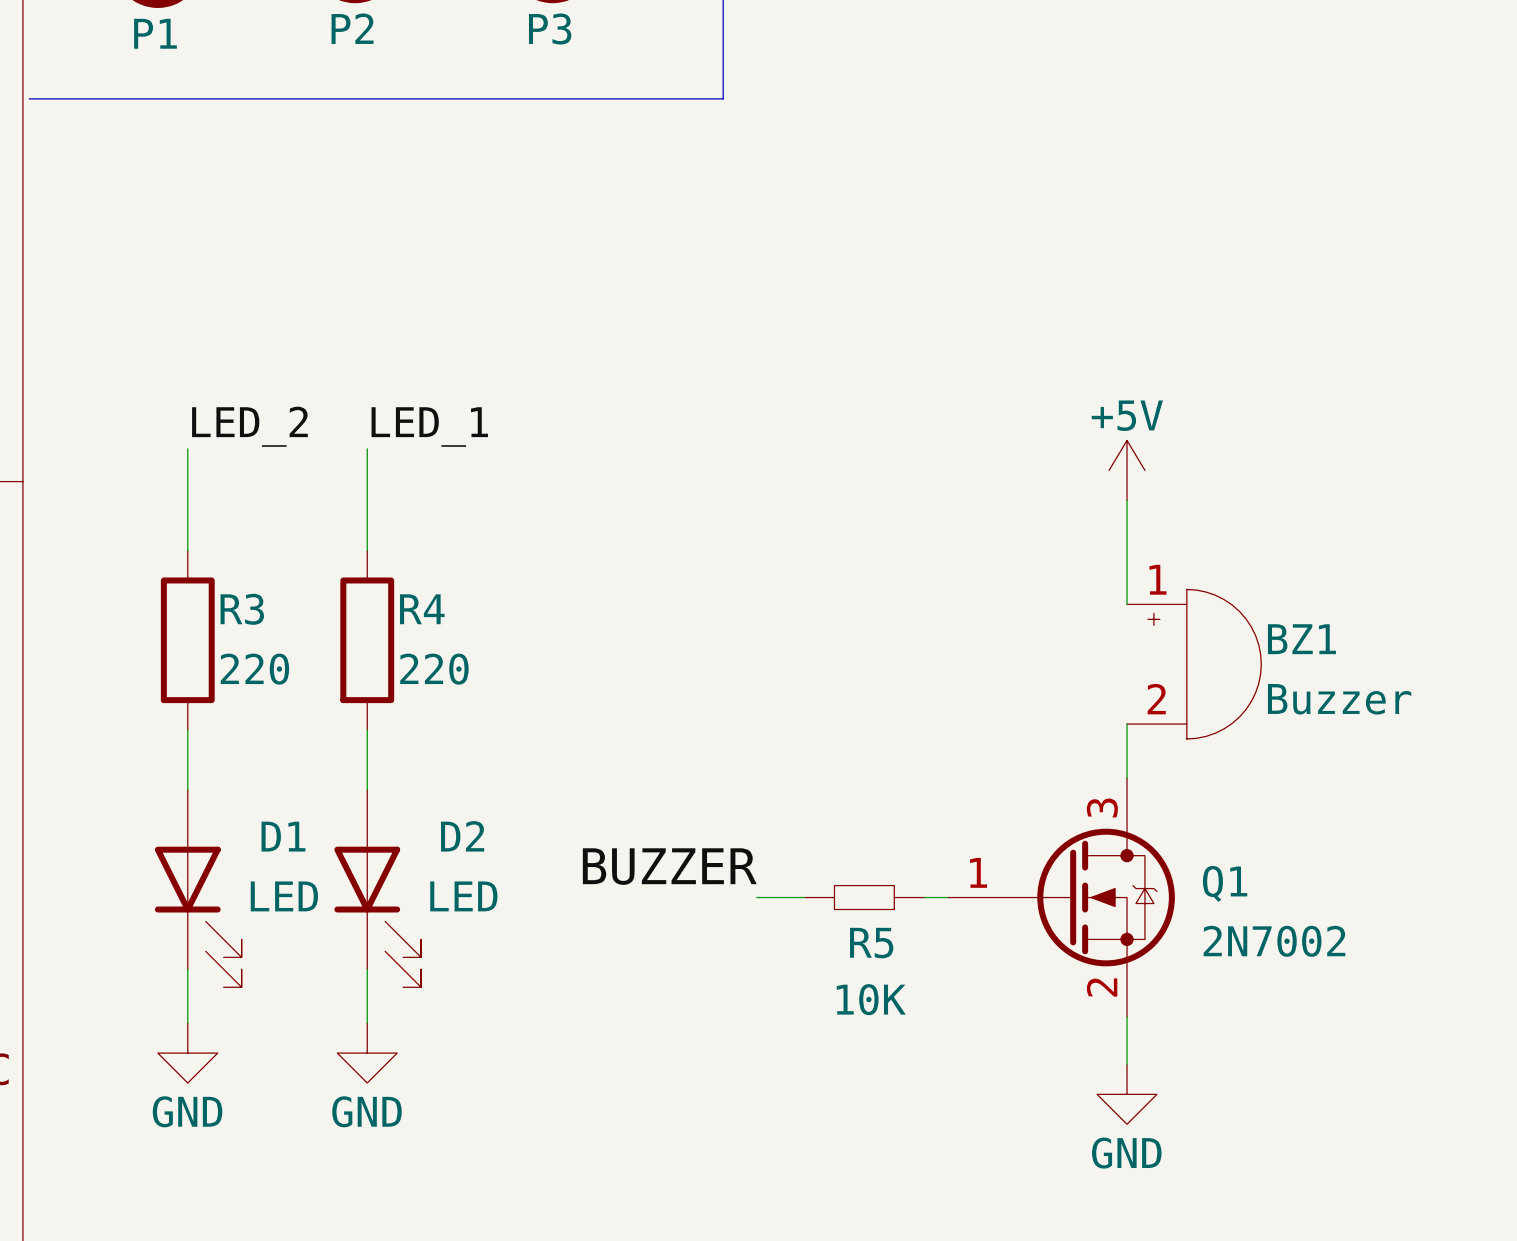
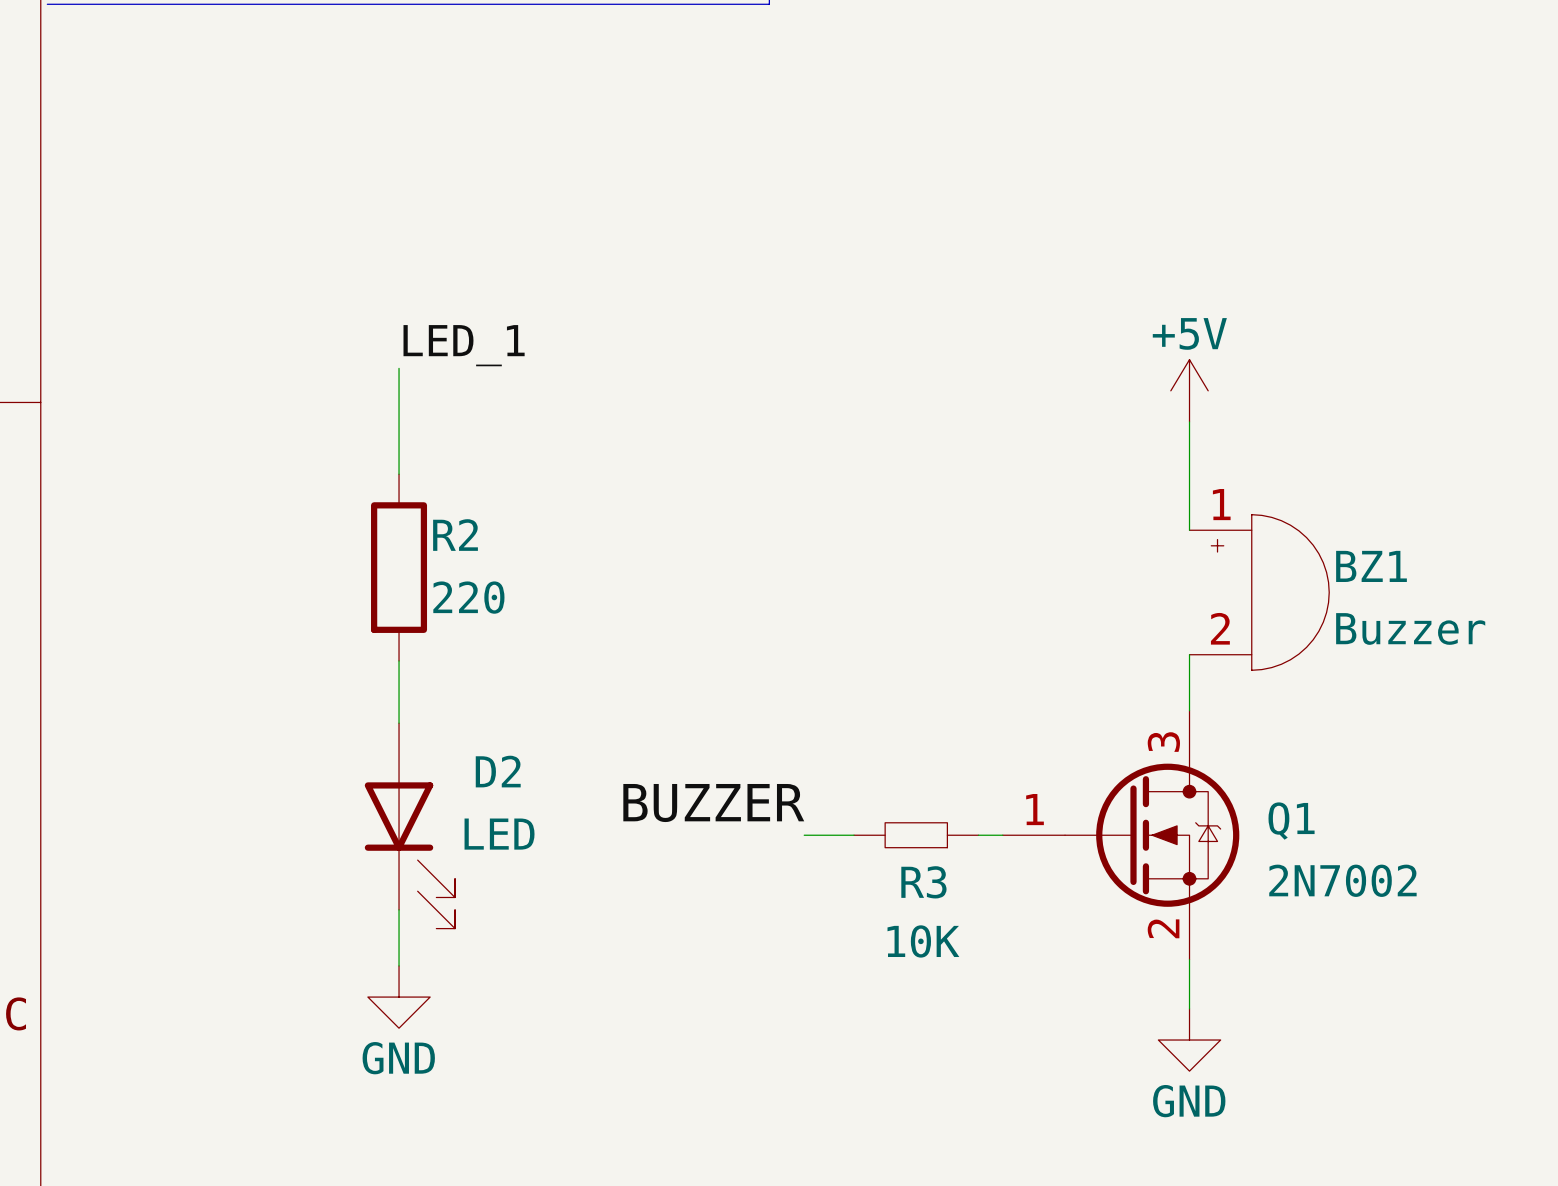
label: LED_2 (249, 426) -> none
wire: (187, 448) (187, 550) -> none
R4 name: R4 (422, 609) -> R2 (455, 535)
R3: 220 (187, 640) -> none
wire: (187, 730) (187, 789) -> none
D1: LED (198, 888) -> none
R5 name: R5 (871, 943) -> R3 (923, 882)
wire: (187, 969) (187, 1023) -> none
power symbol: GND (187, 1053) -> none

